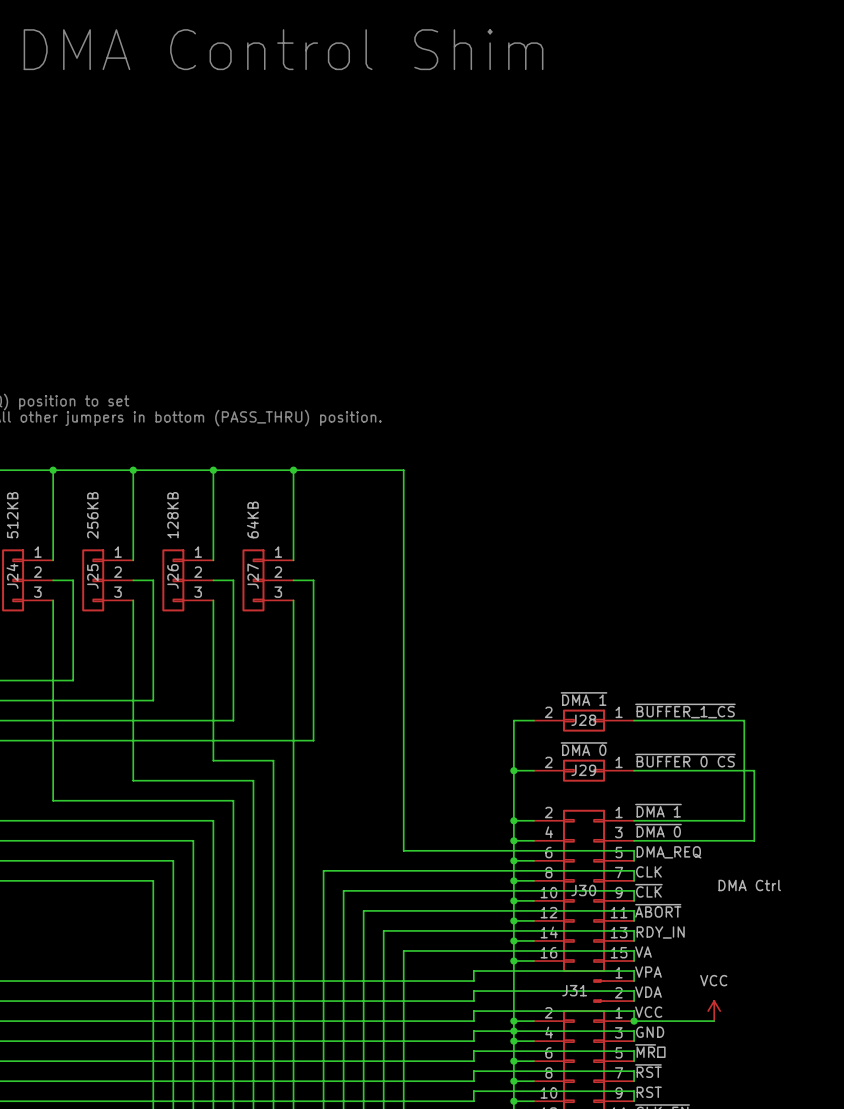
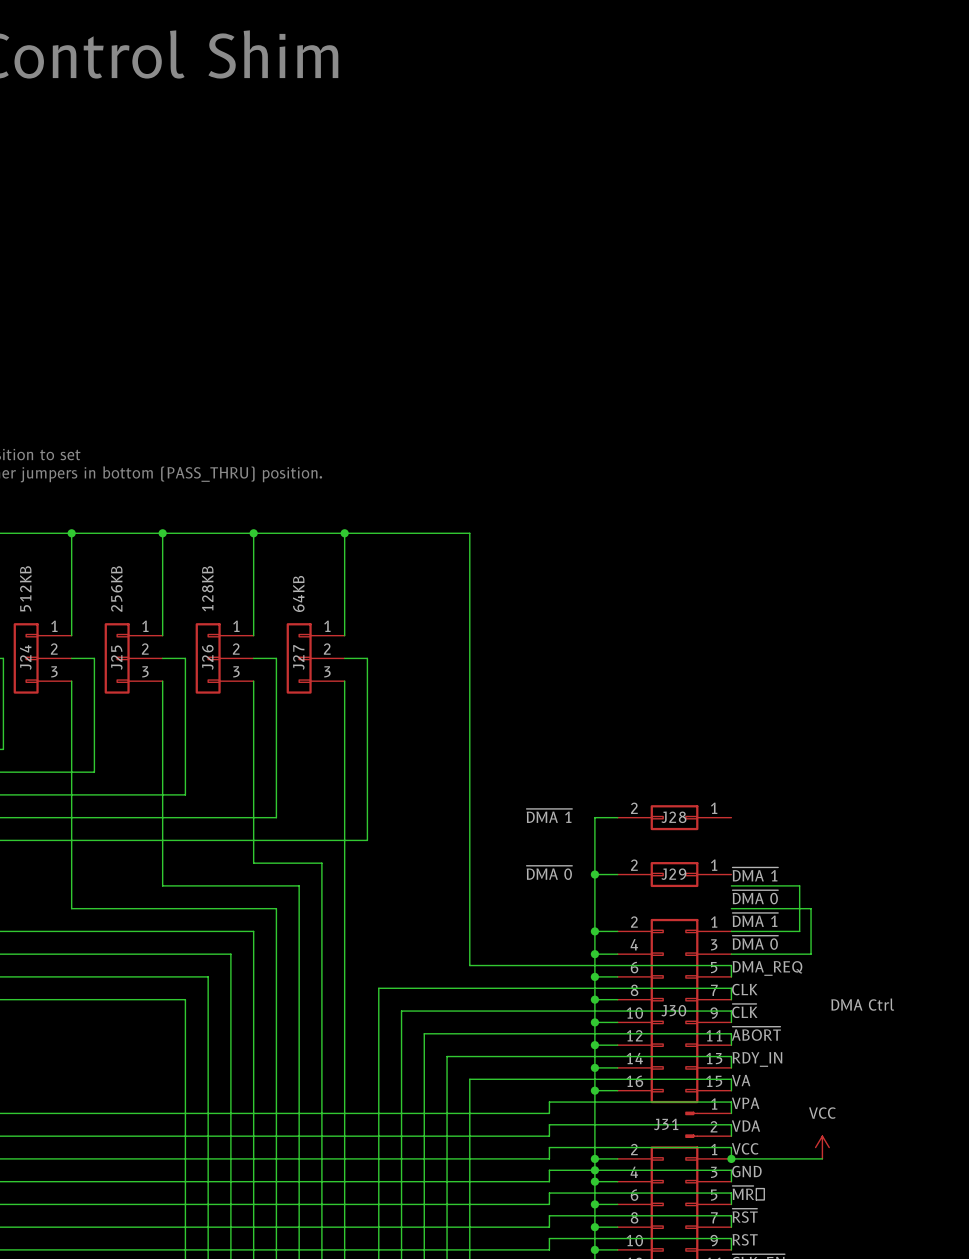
J28 value position: ~{DMA 1} (584, 699) -> ~{DMA 1} (549, 815)
label: ~{BUFFER_1_CS} (685, 710) -> none
wire: (634, 720) (744, 720) (744, 820) (694, 820) -> (731, 885) (799, 885) (799, 931)
J29 value position: ~{DMA 0} (584, 749) -> ~{DMA 0} (549, 872)
label: ~{BUFFER 0 CS} (685, 760) -> none
wire: (634, 770) (754, 770) (754, 840) (704, 840) -> (731, 908) (811, 908) (811, 954)
label: none -> ~{DMA 1} (755, 874)
label: none -> ~{DMA 0} (755, 897)

